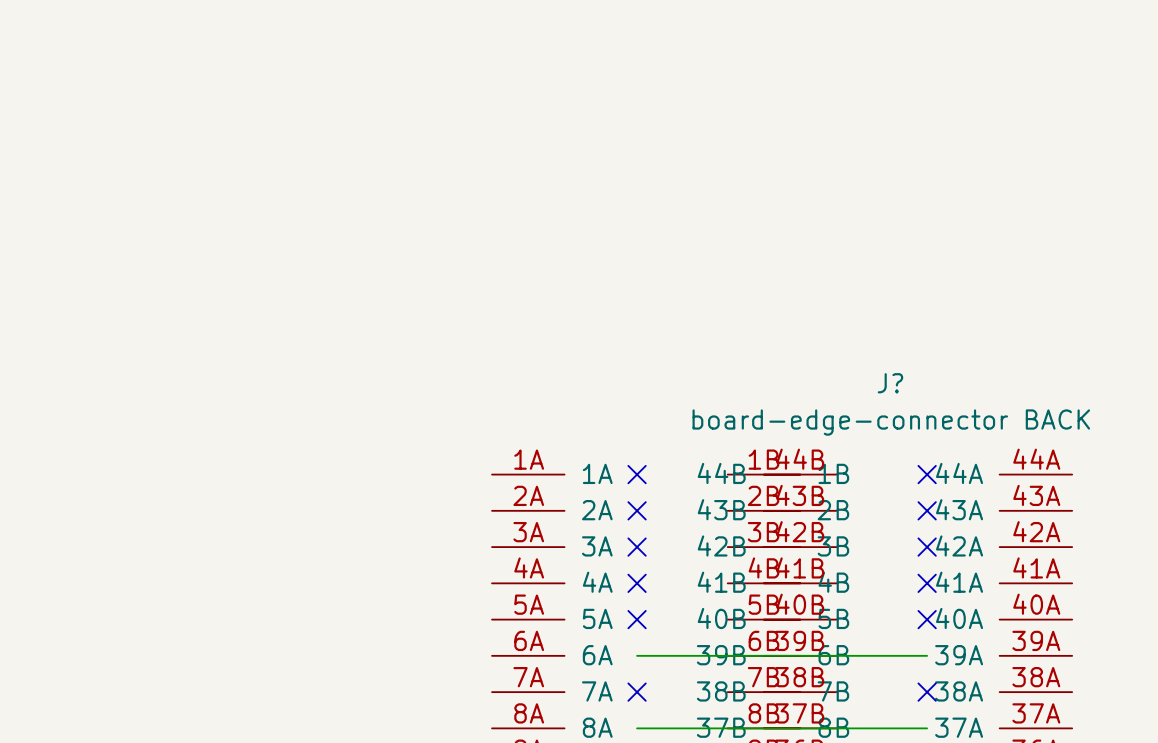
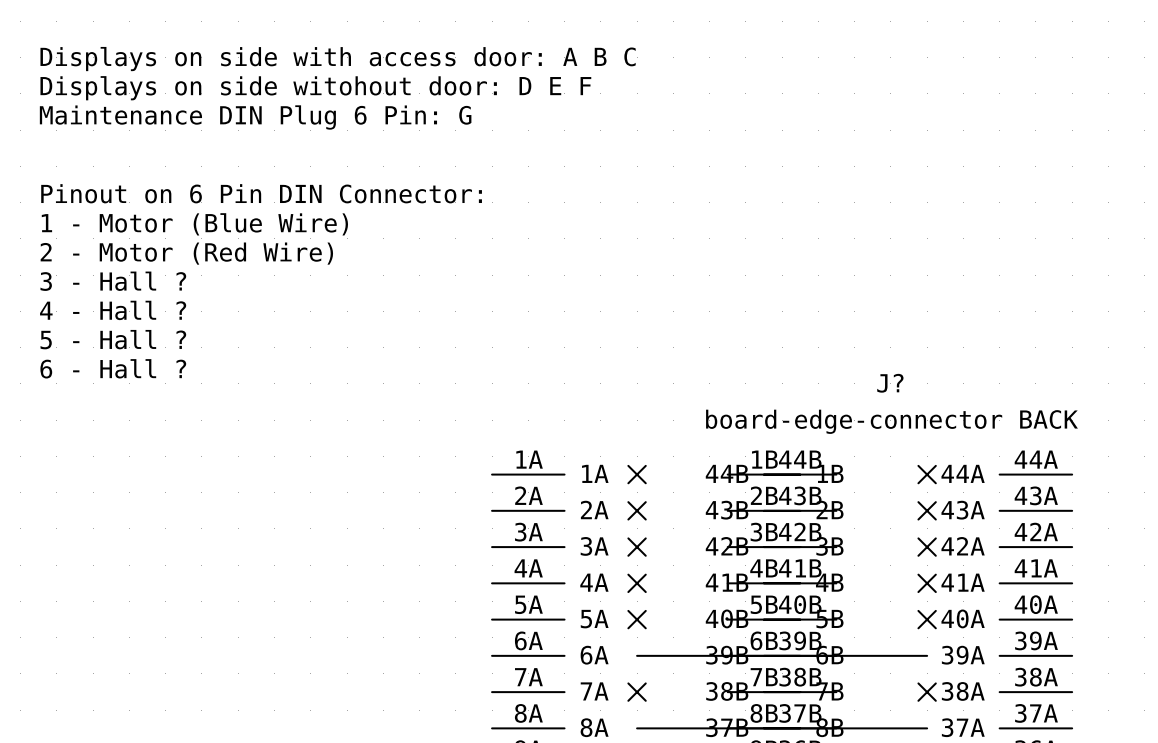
text: none -> Displays on side with access door: A B C (338, 59)
text: none -> Displays on side witohout door: D E F (315, 88)
text: none -> Maintenance DIN Plug 6 Pin: G (255, 117)
text: none -> Pinout on 6 Pin DIN Connector: (261, 193)
text: none -> 1 - Motor (Blue Wire) (194, 224)
text: none -> 2 - Motor (Red Wire) (186, 253)
text: none -> 3 - Hall ? (113, 281)
text: none -> 4 - Hall ? (113, 310)
text: none -> 5 - Hall ? (113, 339)
text: none -> 6 - Hall ? (113, 368)

